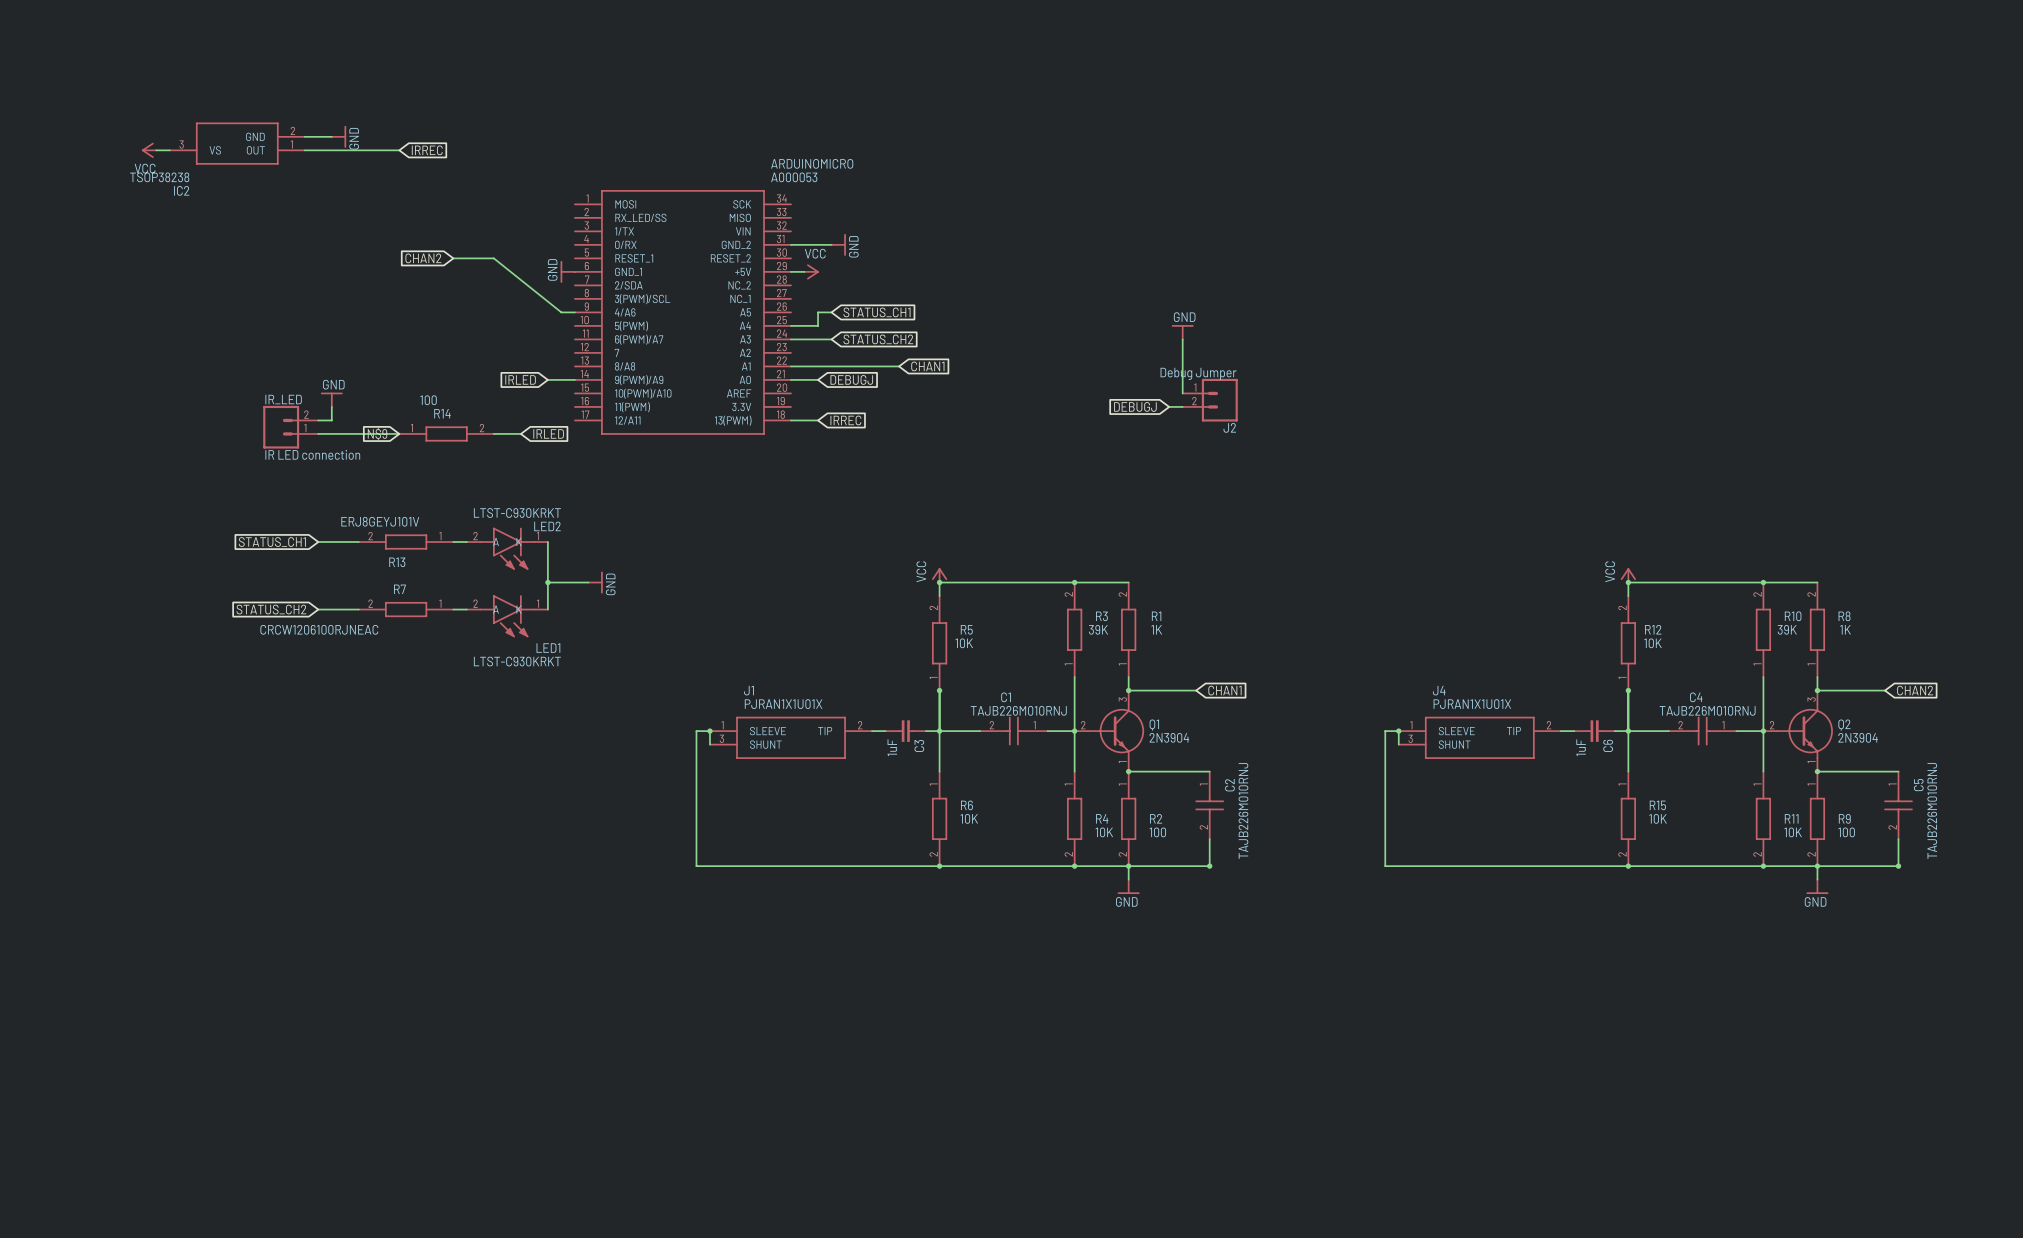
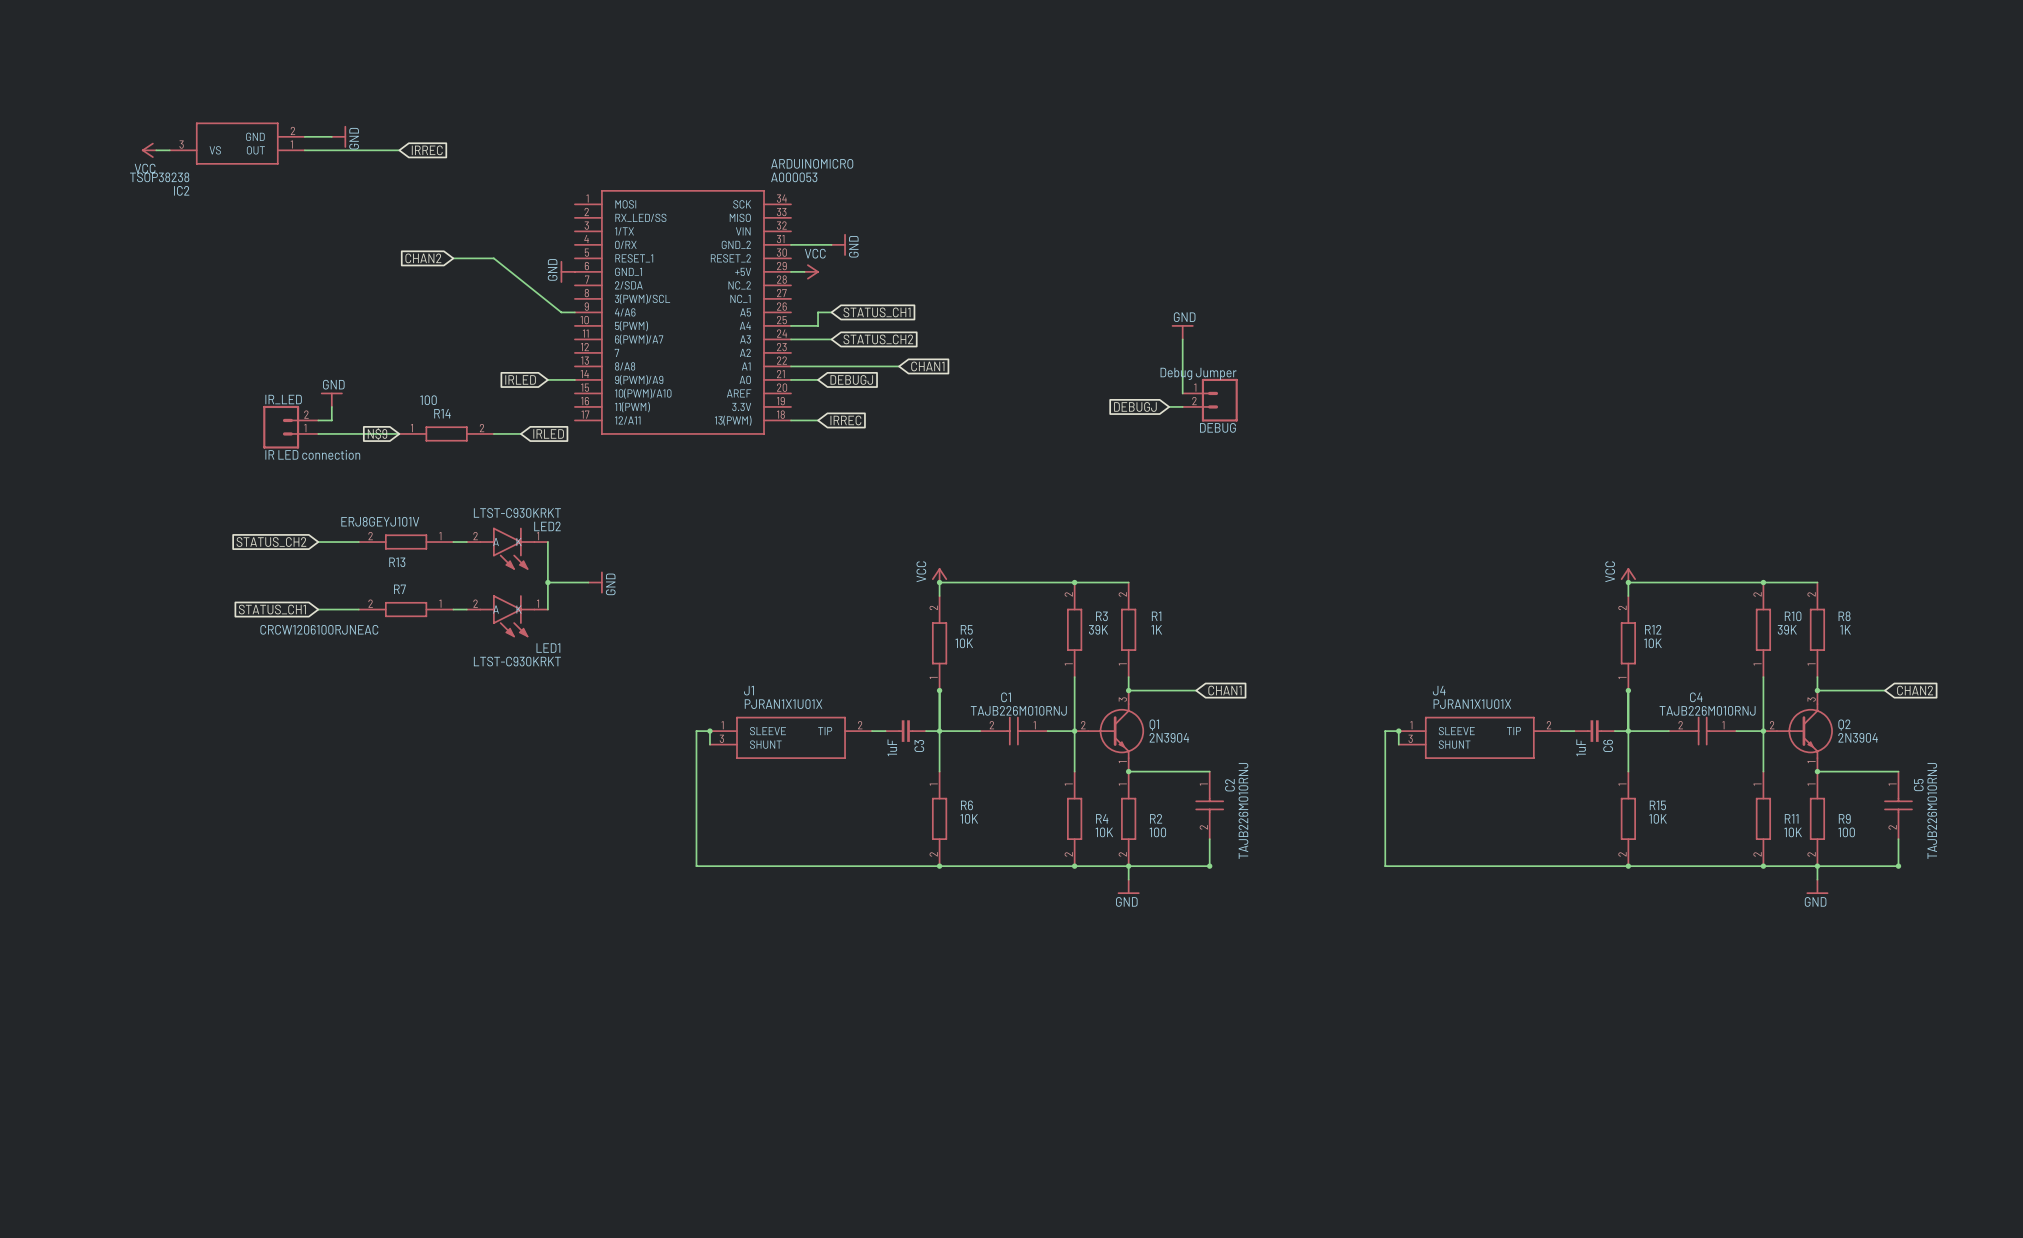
J2 name: J2 (1229, 427) -> DEBUG (1217, 427)
global label: STATUS_CH1 (272, 542) -> STATUS_CH2 (271, 542)
global label: STATUS_CH2 (271, 609) -> STATUS_CH1 (272, 609)

